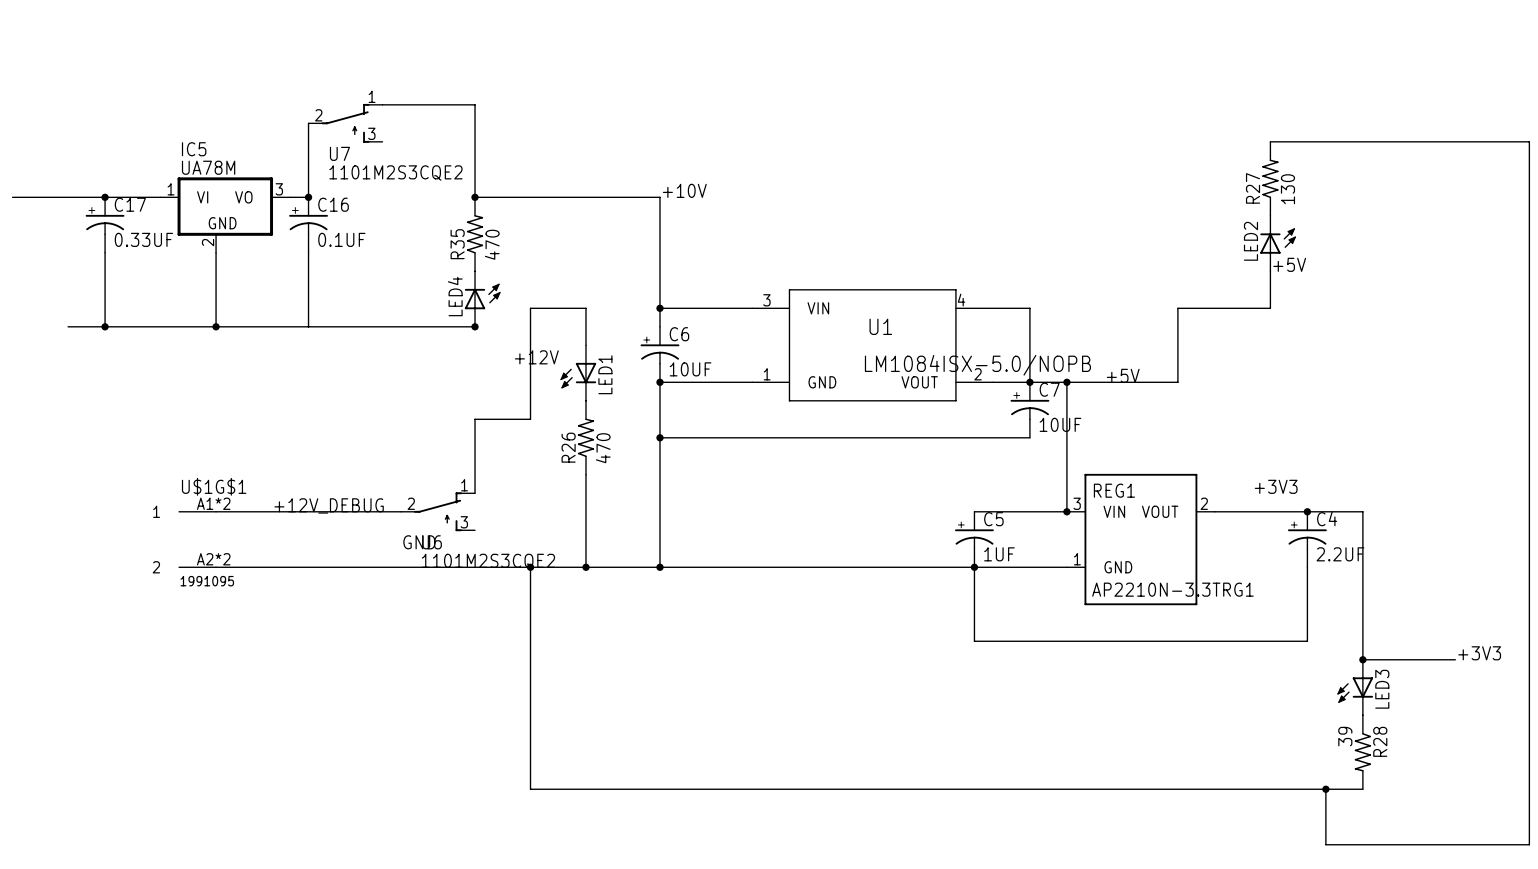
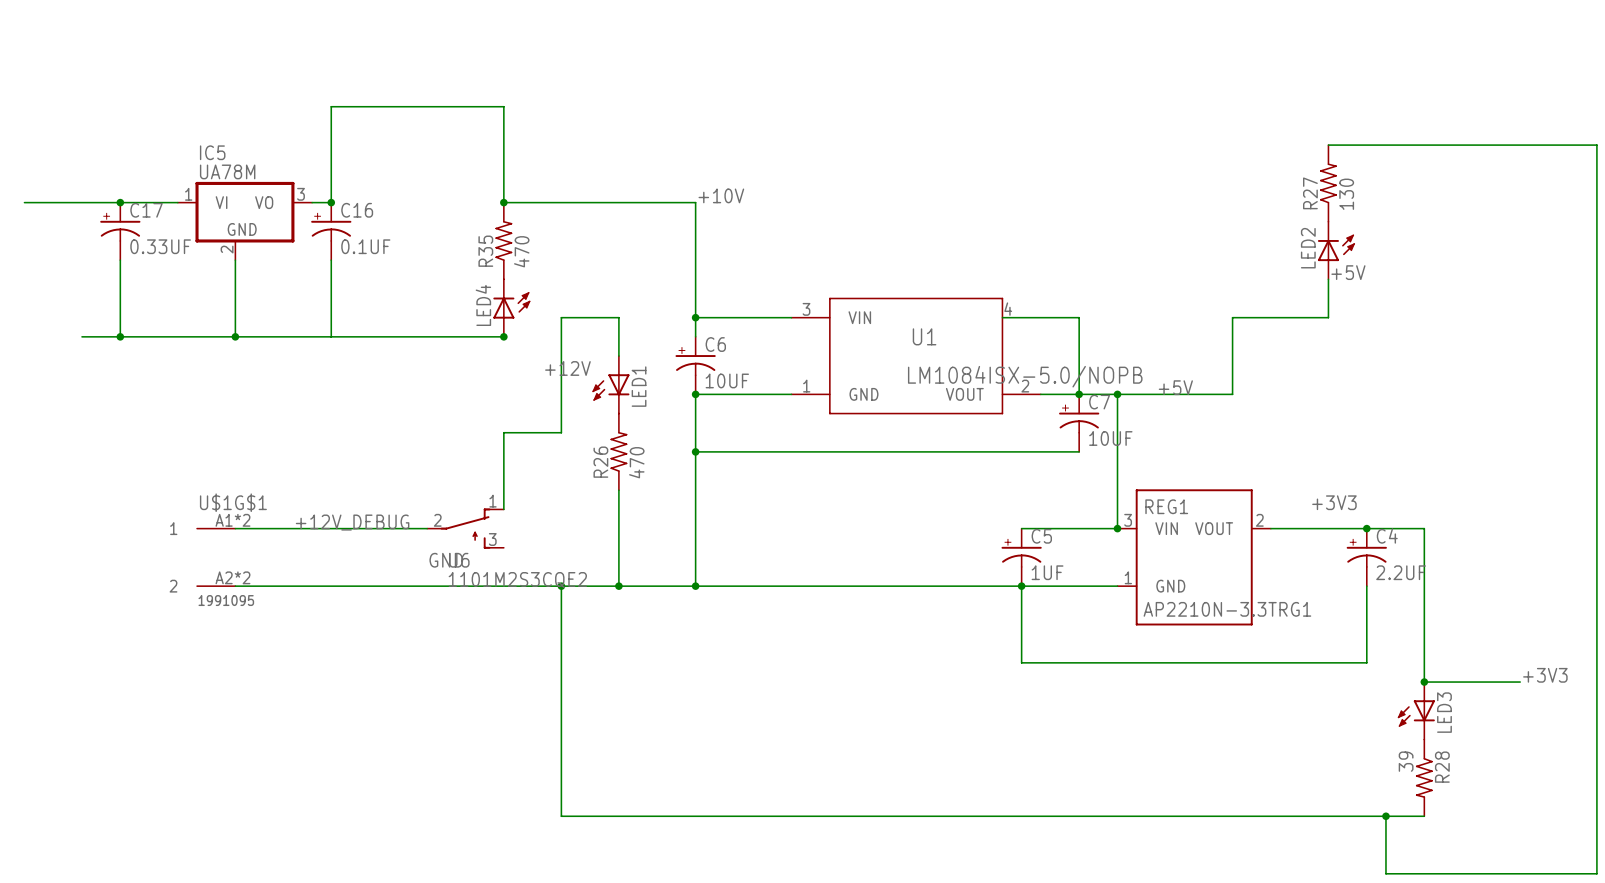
wire: none -> (407, 106) (331, 106) (331, 125)
U7: 1101M2S3CQE2 (345, 123) -> none

